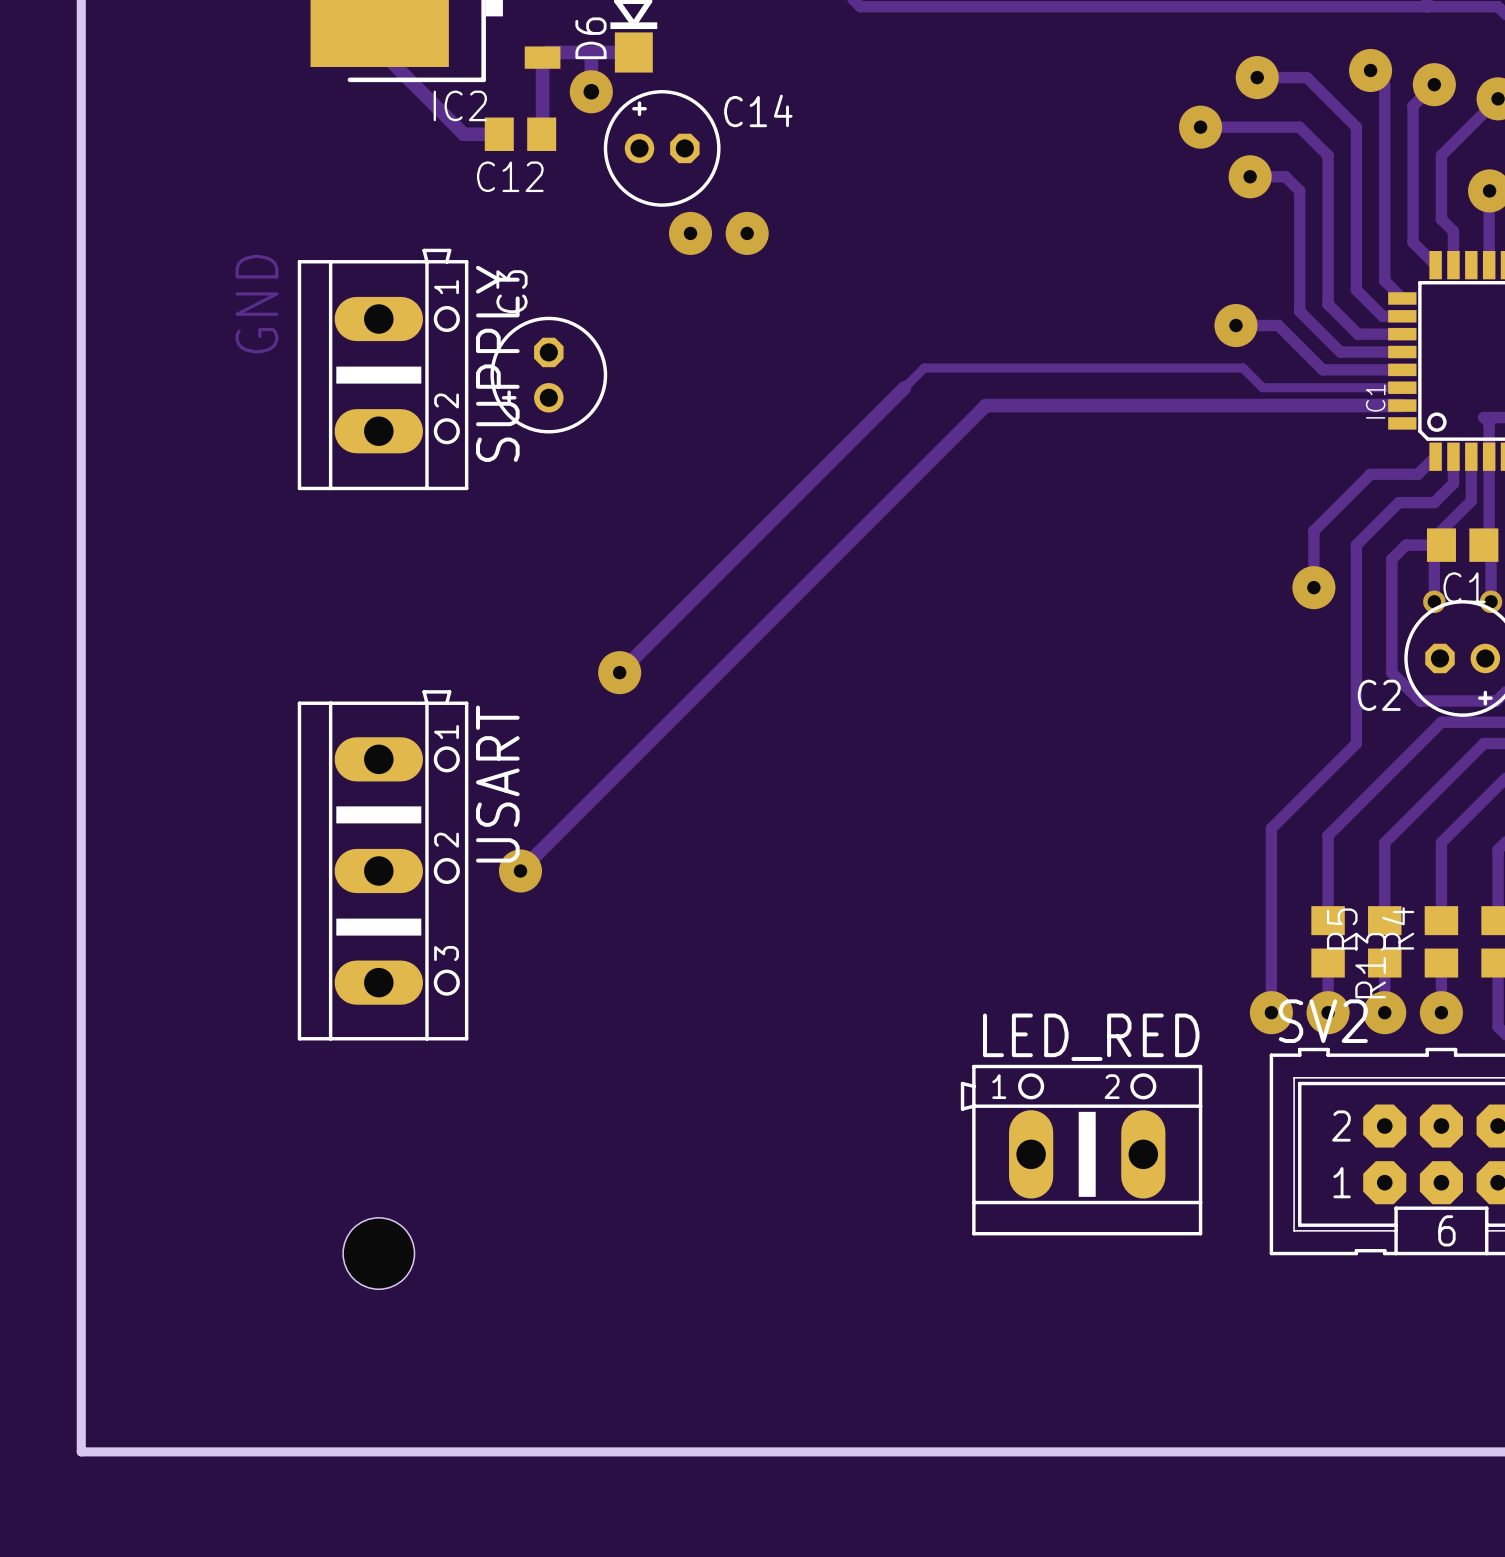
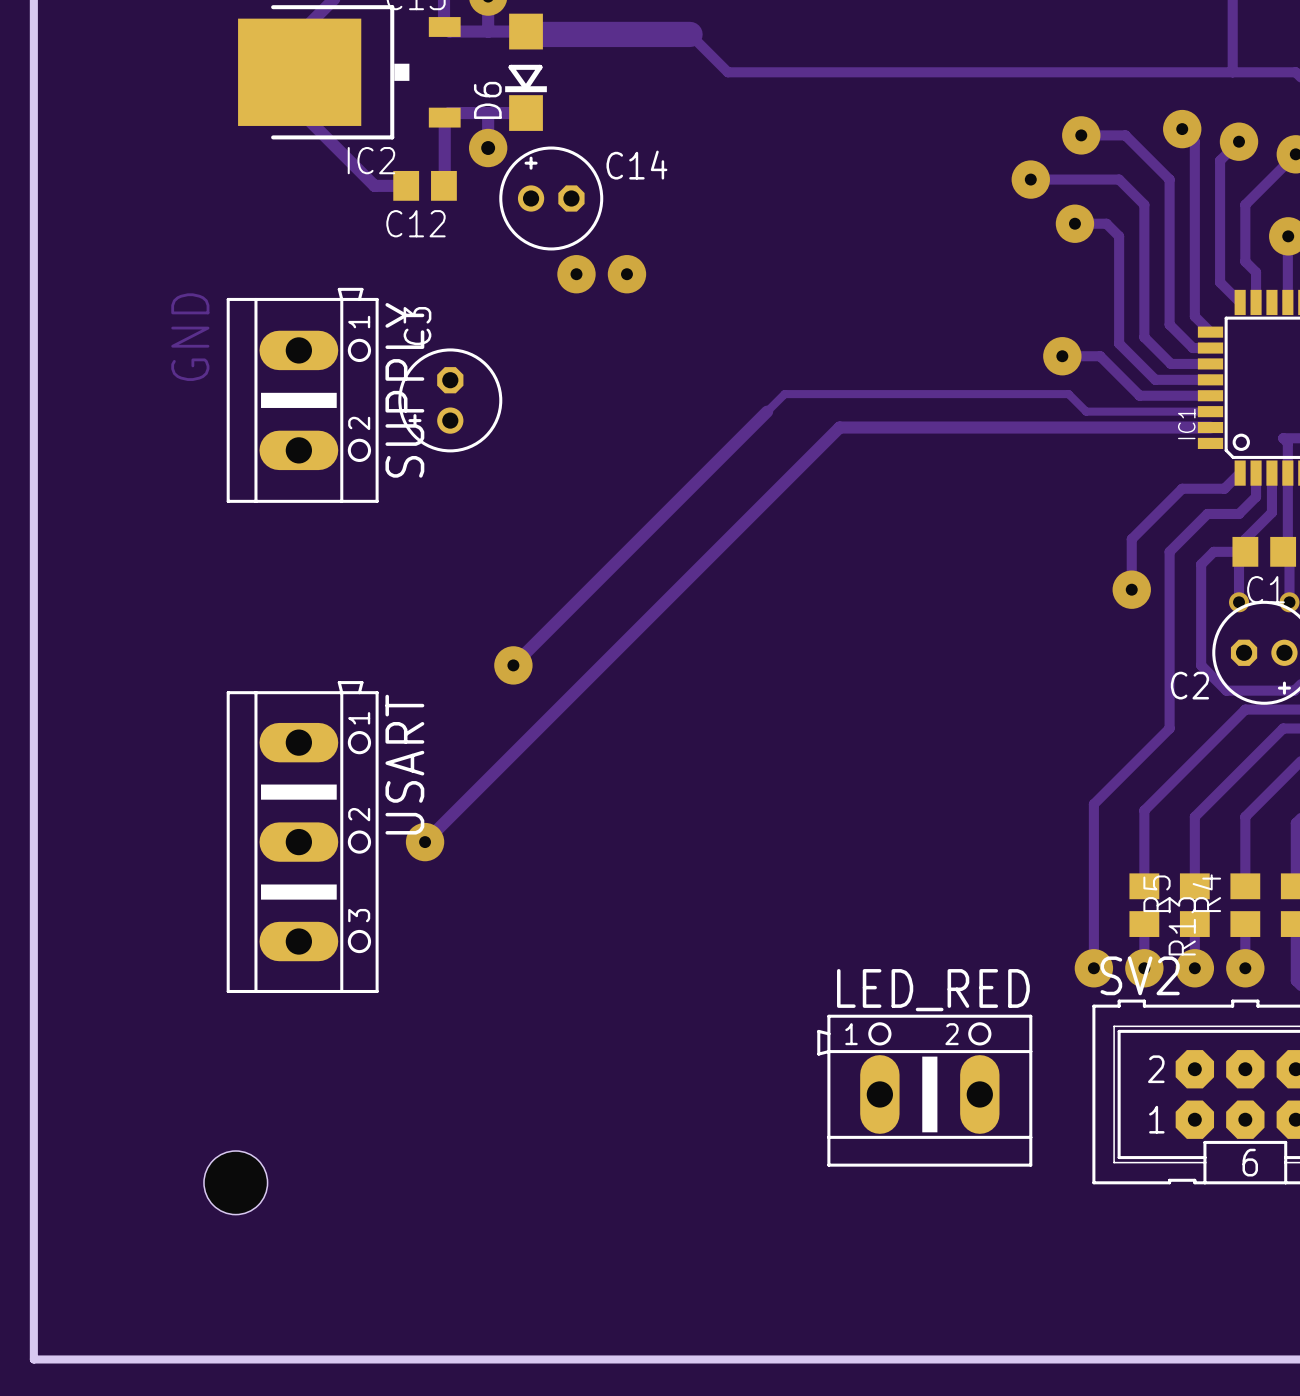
hole position: (378, 1253) -> (235, 1182)

